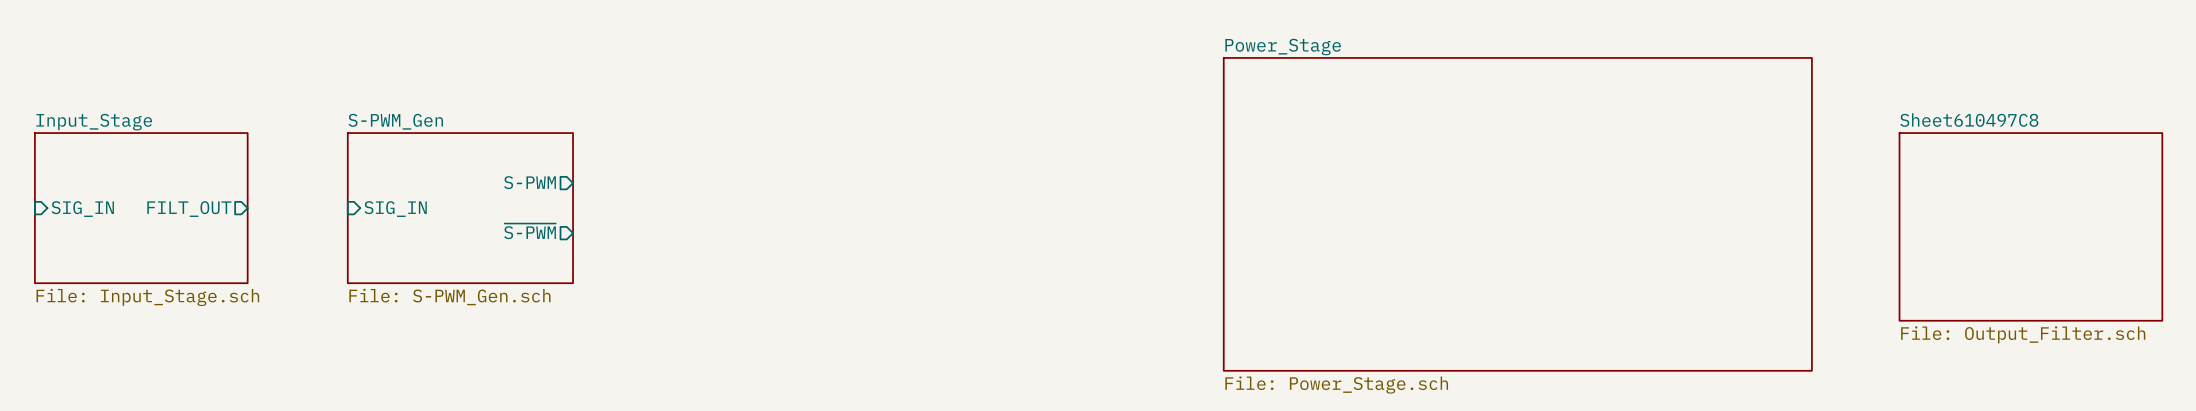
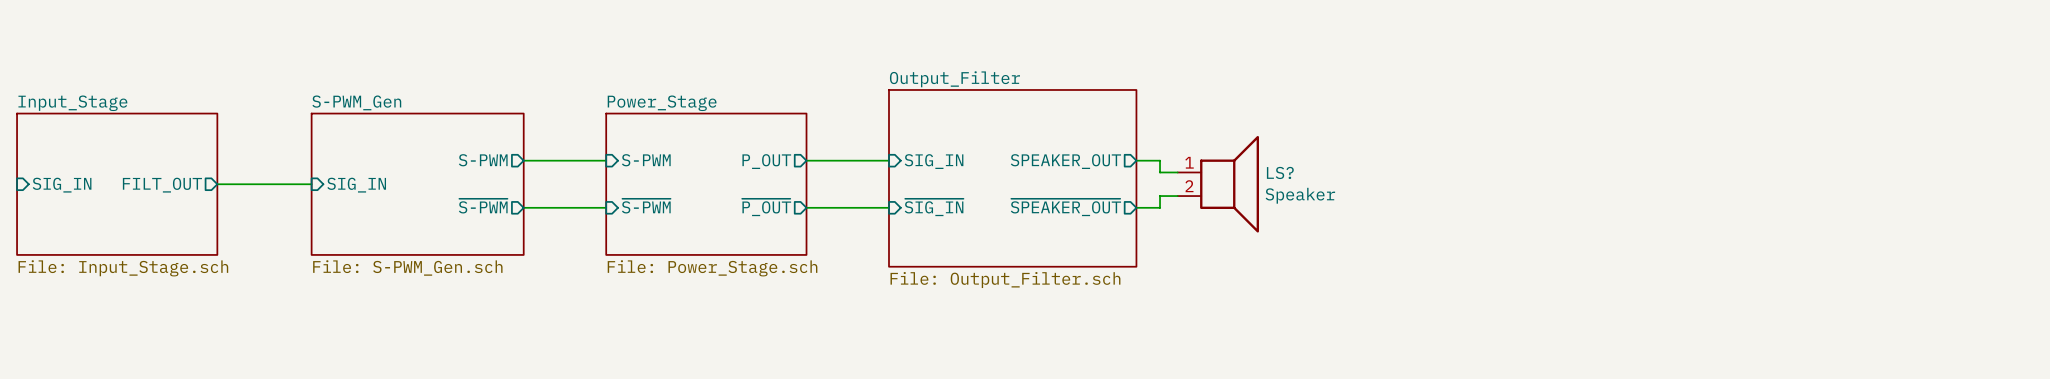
sheet pin: none -> S-PWM (646, 160)
wire: none -> (523, 160) (606, 160)
wire: none -> (806, 160) (888, 160)
wire: none -> (1136, 160) (1160, 160) (1160, 172) (1177, 172)
sheet pin: none -> P_OUT (766, 161)
sheet pin: none -> SIG_IN (934, 161)
sheet pin: none -> SPEAKER_OUT (1065, 161)
sheet Output_Filter: none -> File: Output_Filter.sch (1012, 178)
wire: none -> (217, 184) (311, 184)
sheet Power_Stage: none -> File: Power_Stage.sch (706, 184)
LS?: none -> Speaker (1218, 184)
sheet Power_Stage: File: Power_Stage.sch (1517, 214) -> none
wire: none -> (1177, 196) (1160, 196) (1160, 207) (1136, 207)
sheet Sheet610497C8: File: Output_Filter.sch (2030, 226) -> none
sheet pin: none -> ~{S-PWM} (646, 206)
sheet pin: none -> ~{P_OUT} (766, 207)
sheet pin: none -> ~{SIG_IN} (934, 207)
sheet pin: none -> ~{SPEAKER_OUT} (1065, 207)
wire: none -> (523, 207) (606, 207)
wire: none -> (806, 207) (888, 207)

